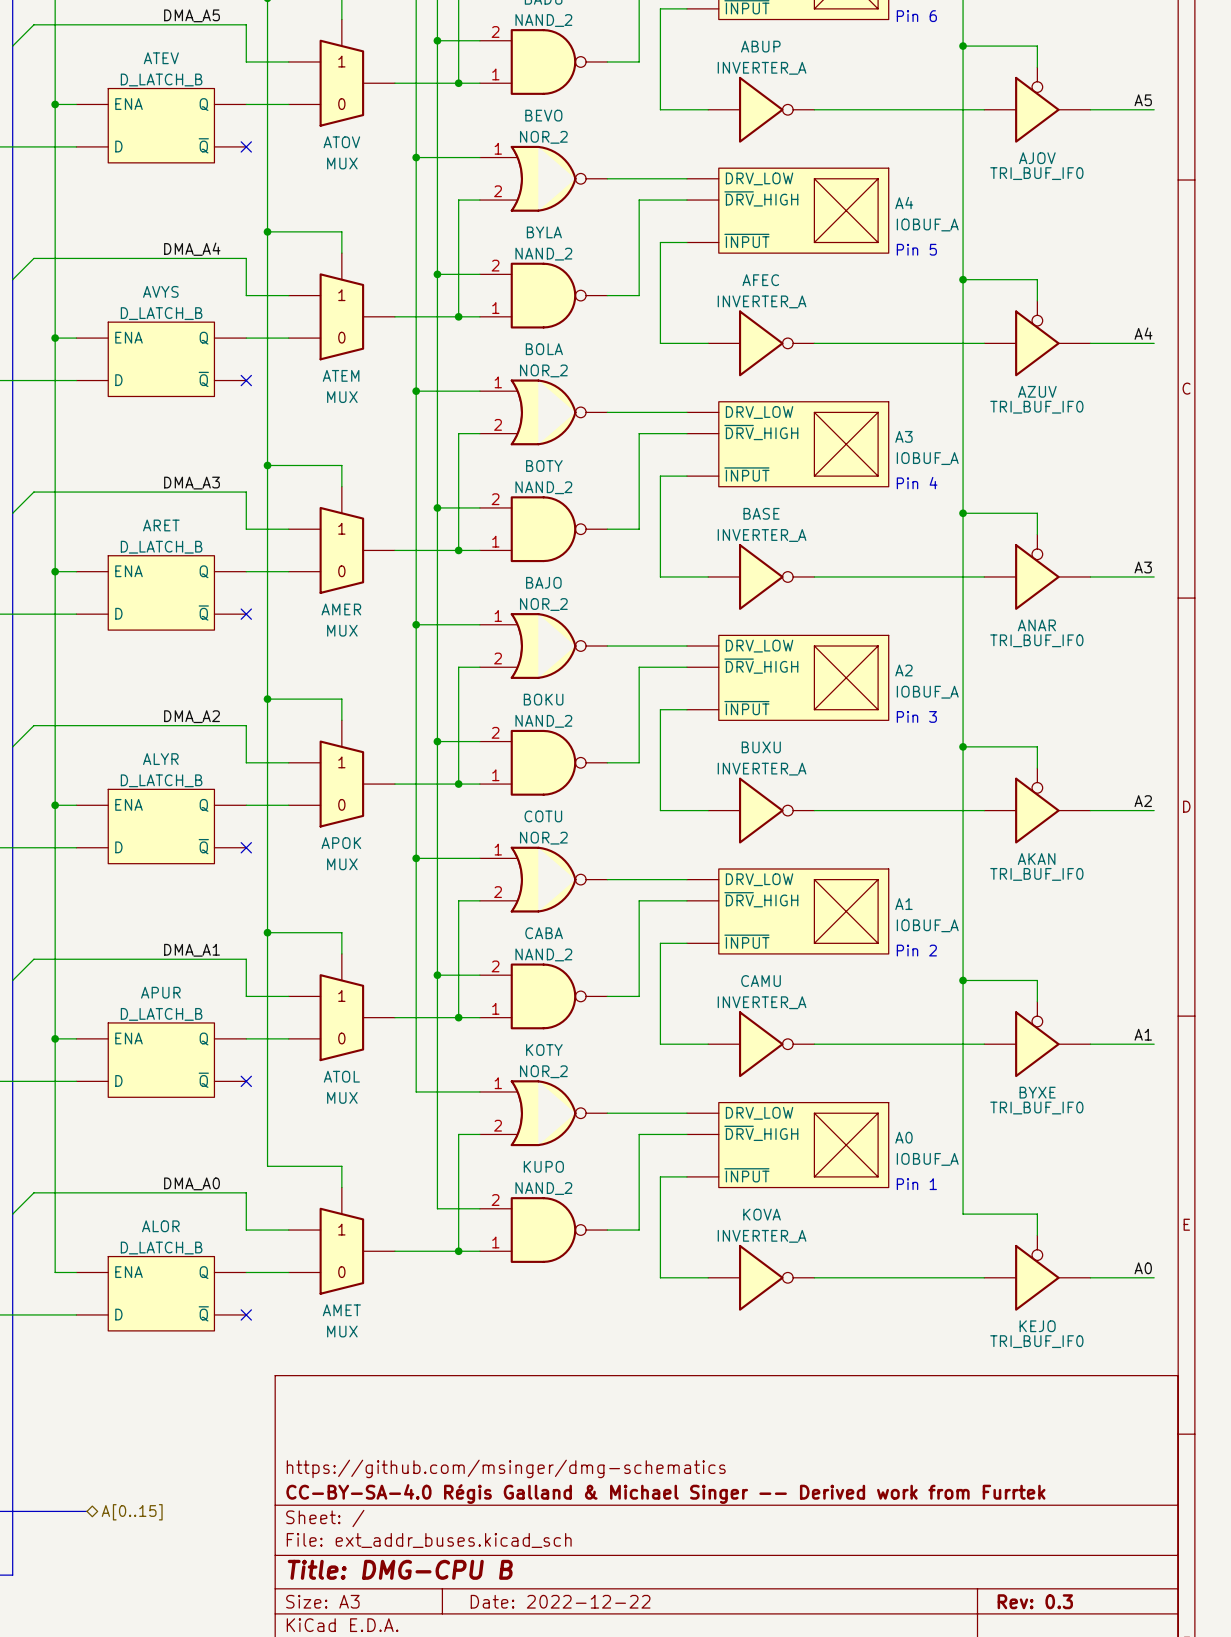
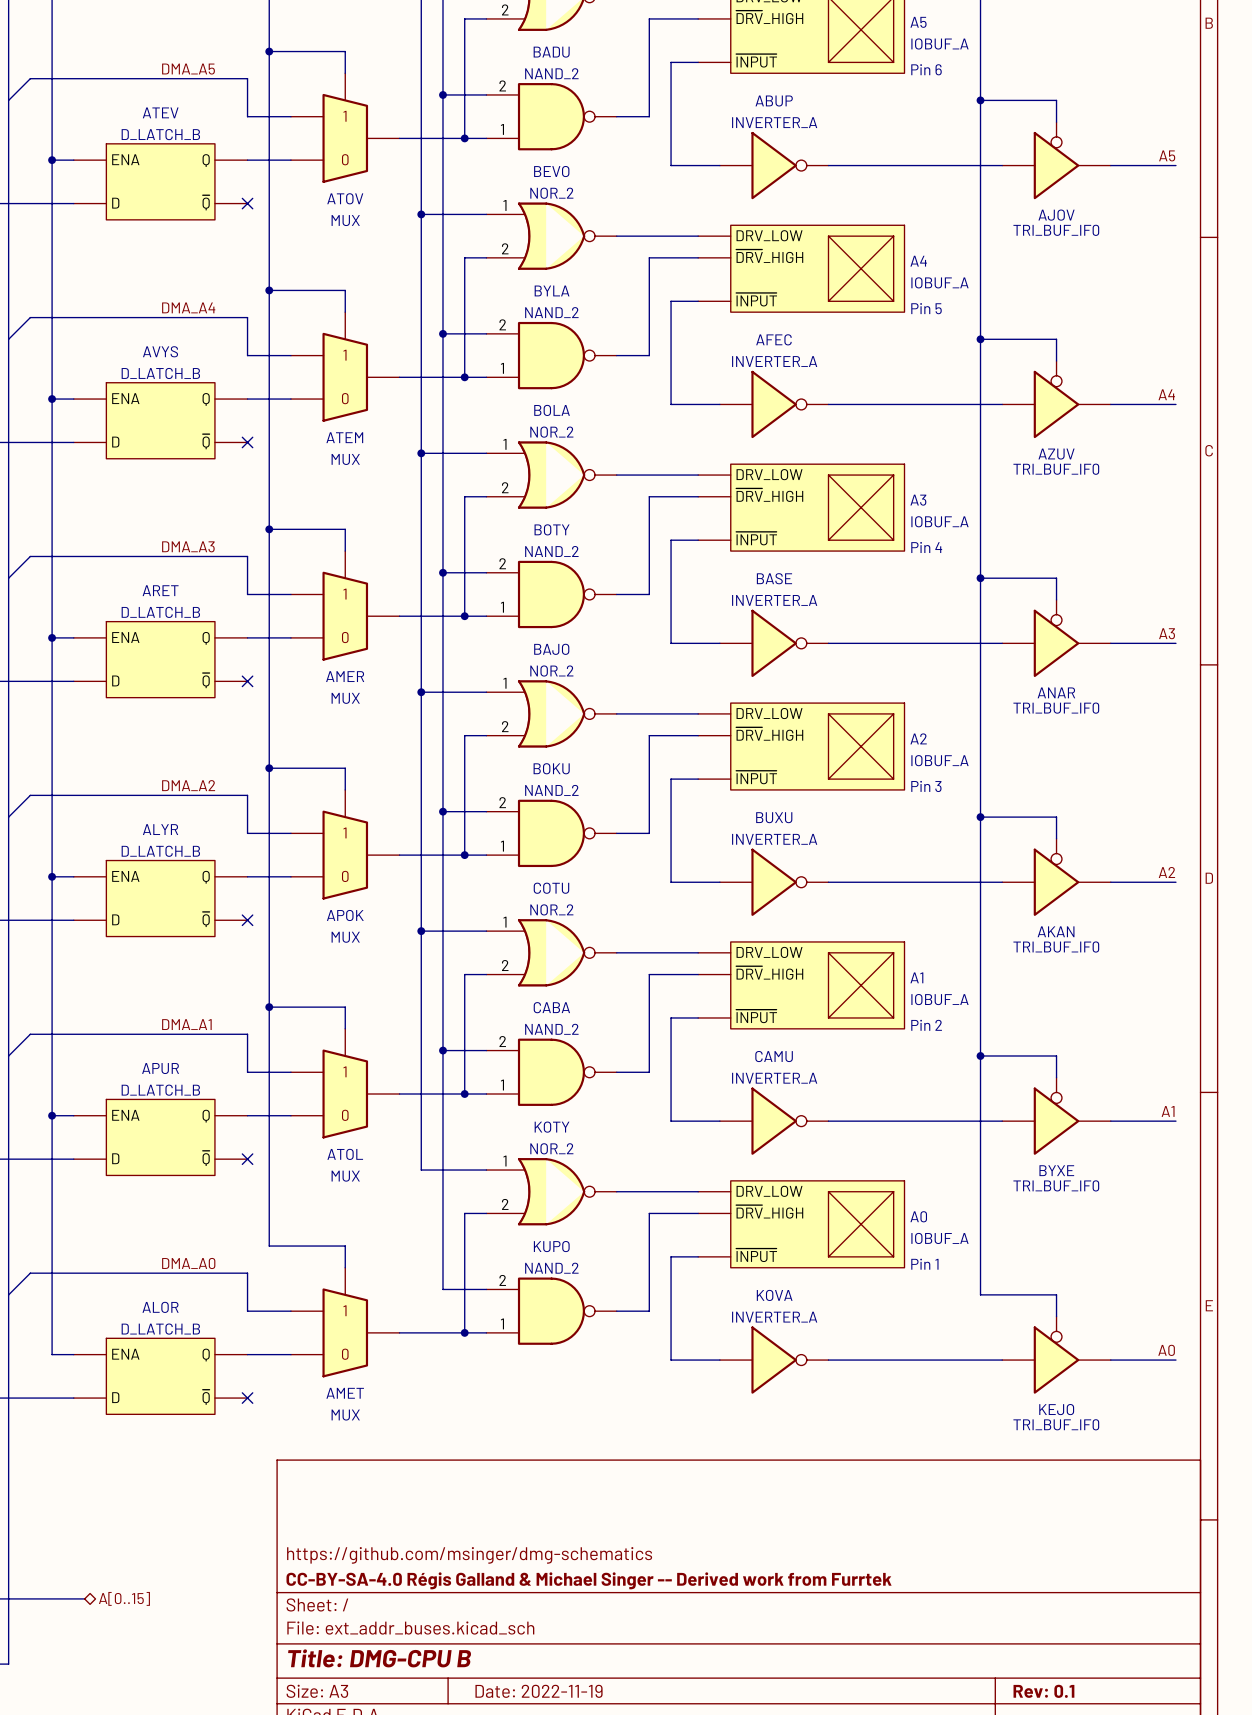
title block: Date: 2022-12-22 (560, 1601) -> Date: 2022-11-19 (539, 1691)
title block: Rev: 0.3 (1035, 1601) -> Rev: 0.1 (1043, 1691)

